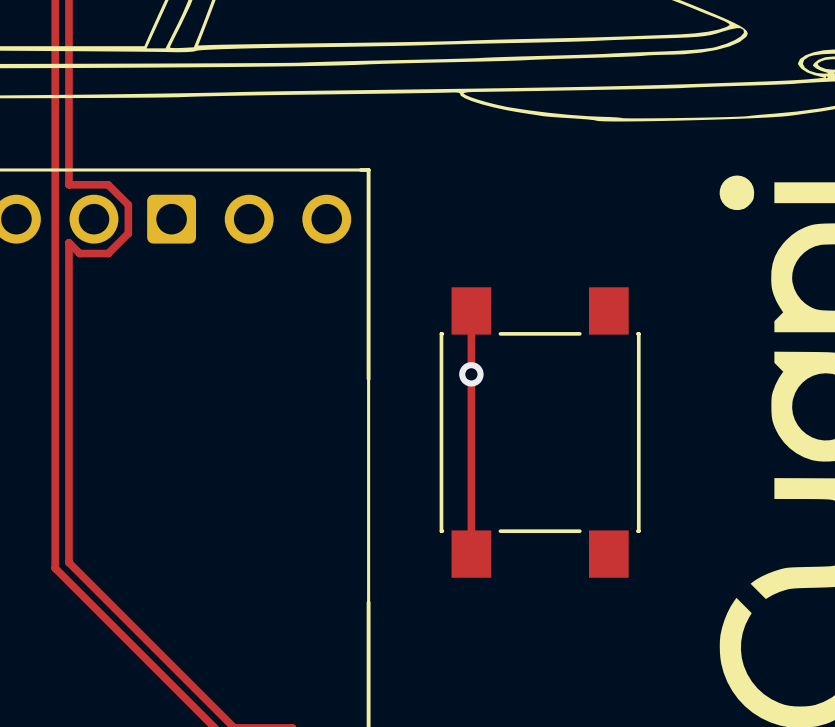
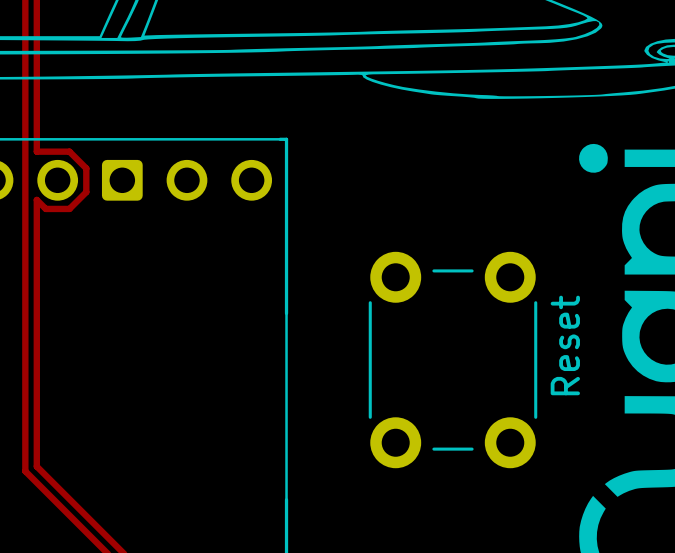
part footprint: [439, 287, 641, 578] -> [368, 251, 538, 469]
track: (471, 310) (471, 554) -> none
via: (471, 374) -> none
part value: none -> Reset (565, 345)

